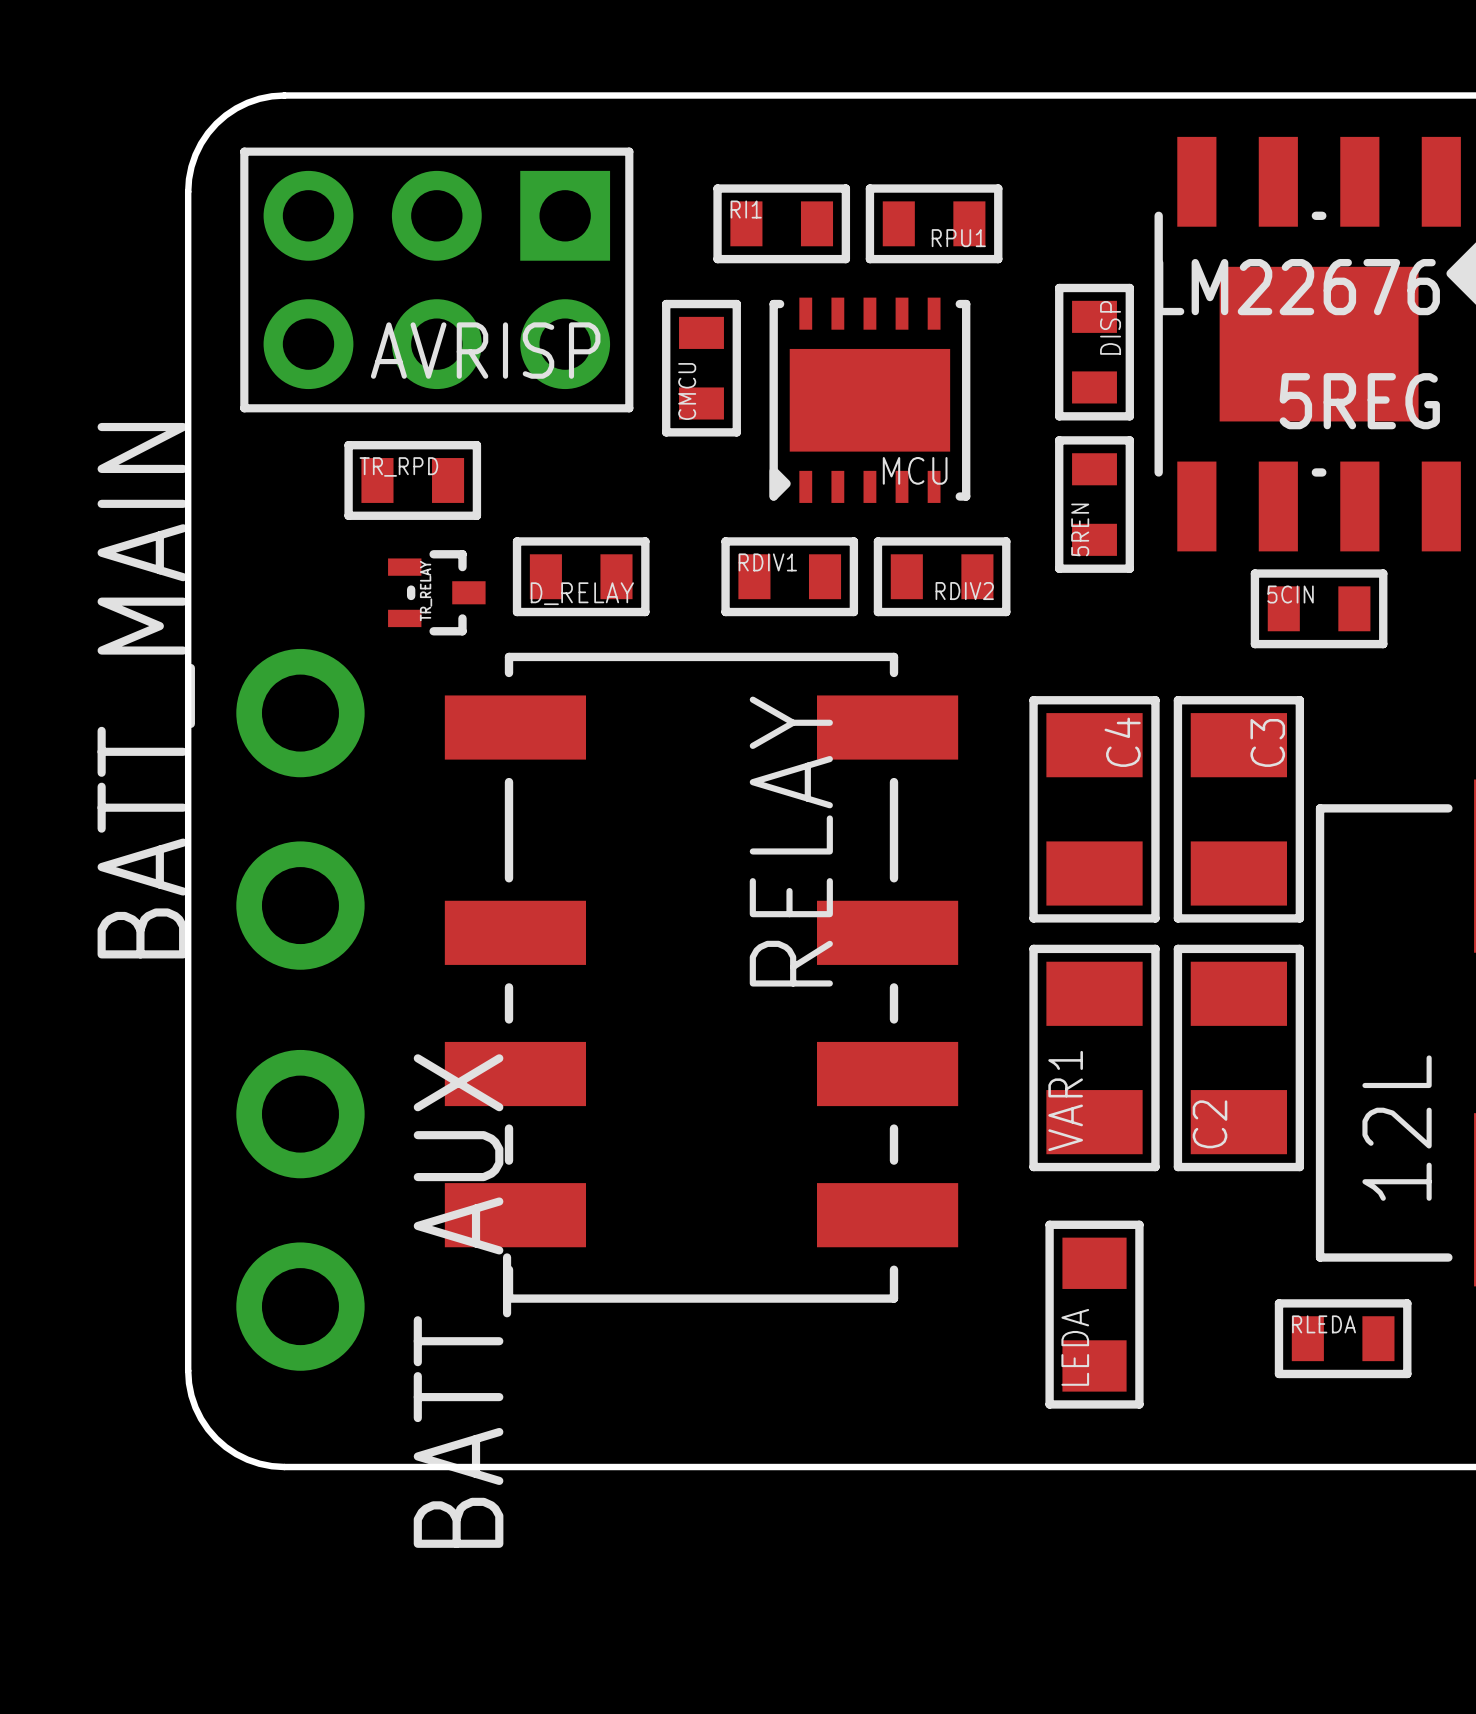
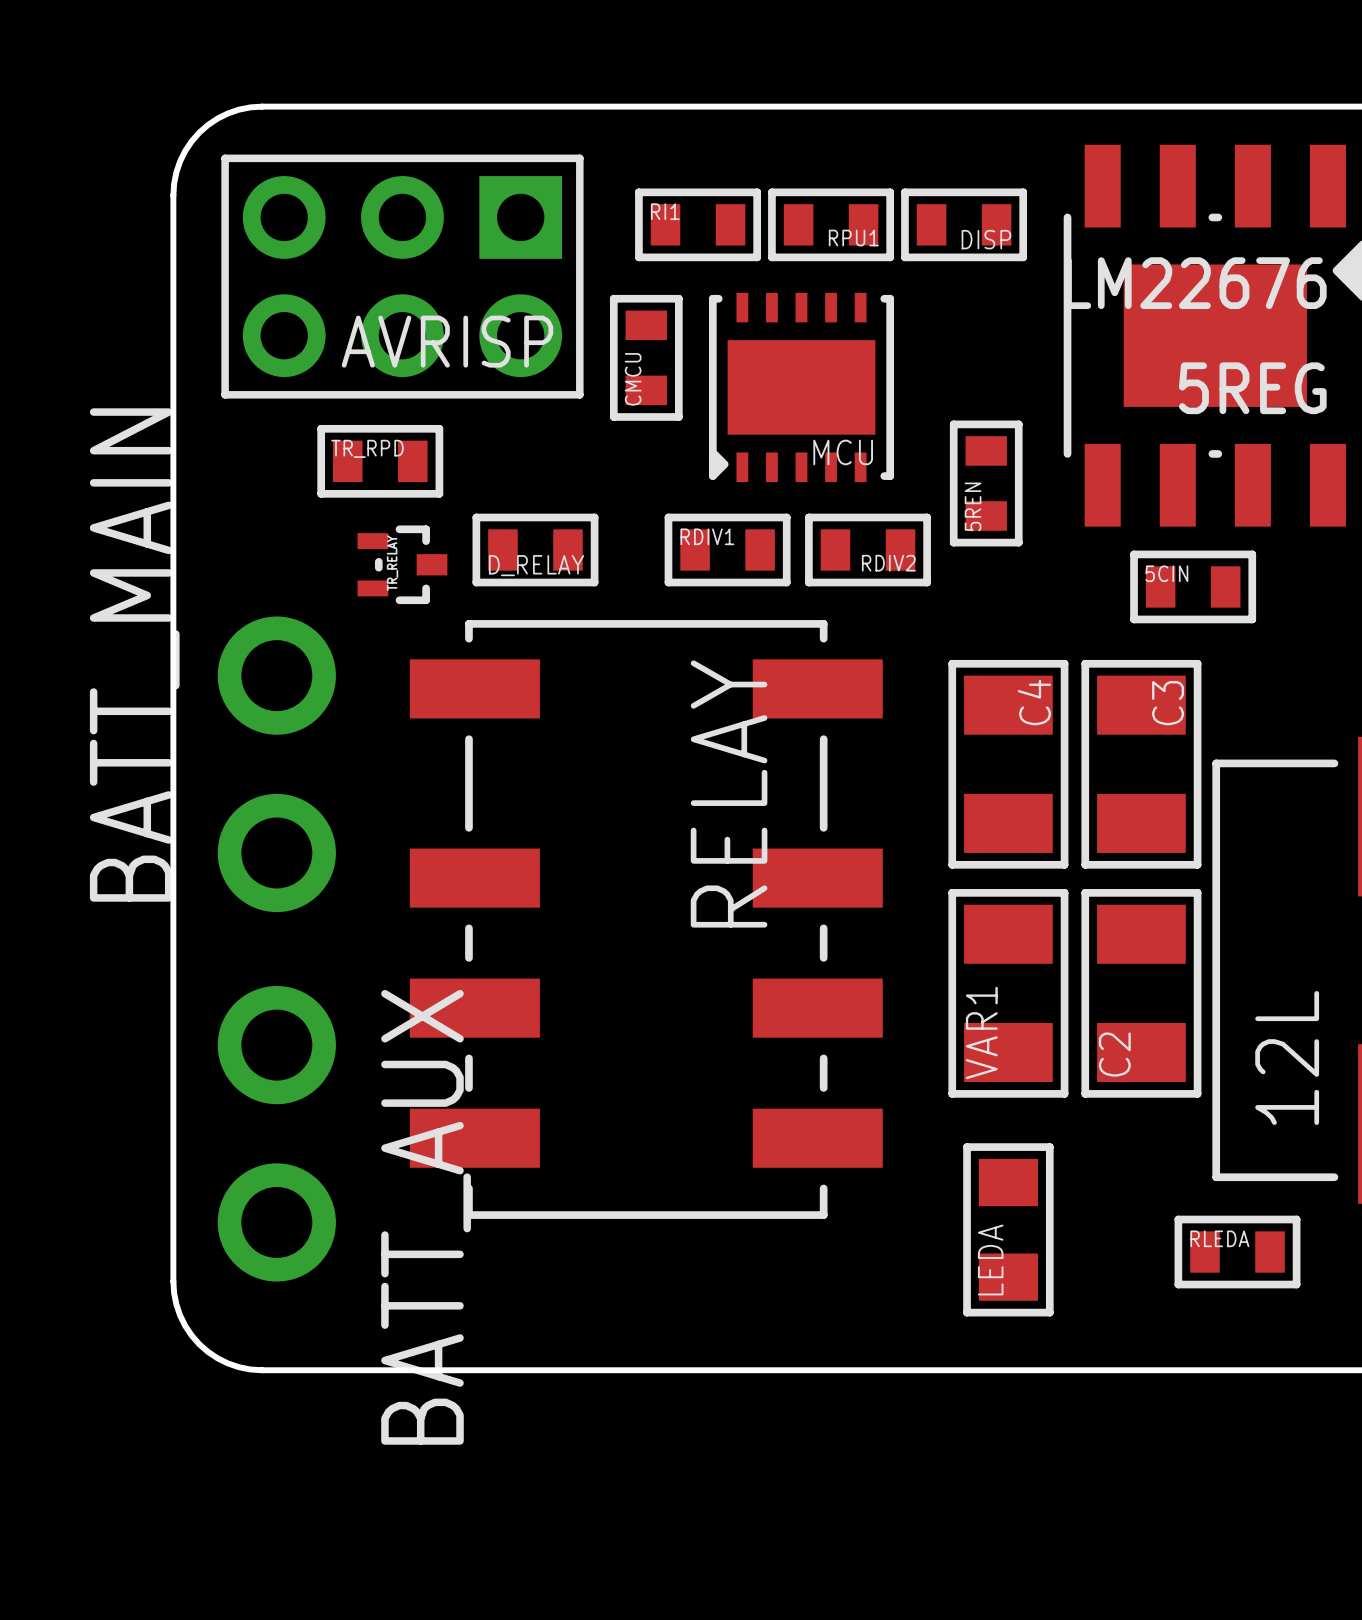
RI1 position: (781, 223) -> (698, 224)
RPU1 position: (934, 223) -> (831, 224)
DISP rotation: 0° (1094, 352) -> 90° clockwise (964, 224)
DISP position: (1094, 352) -> (964, 224)
5REN position: (1094, 504) -> (986, 483)
5CIN position: (1319, 608) -> (1193, 586)

